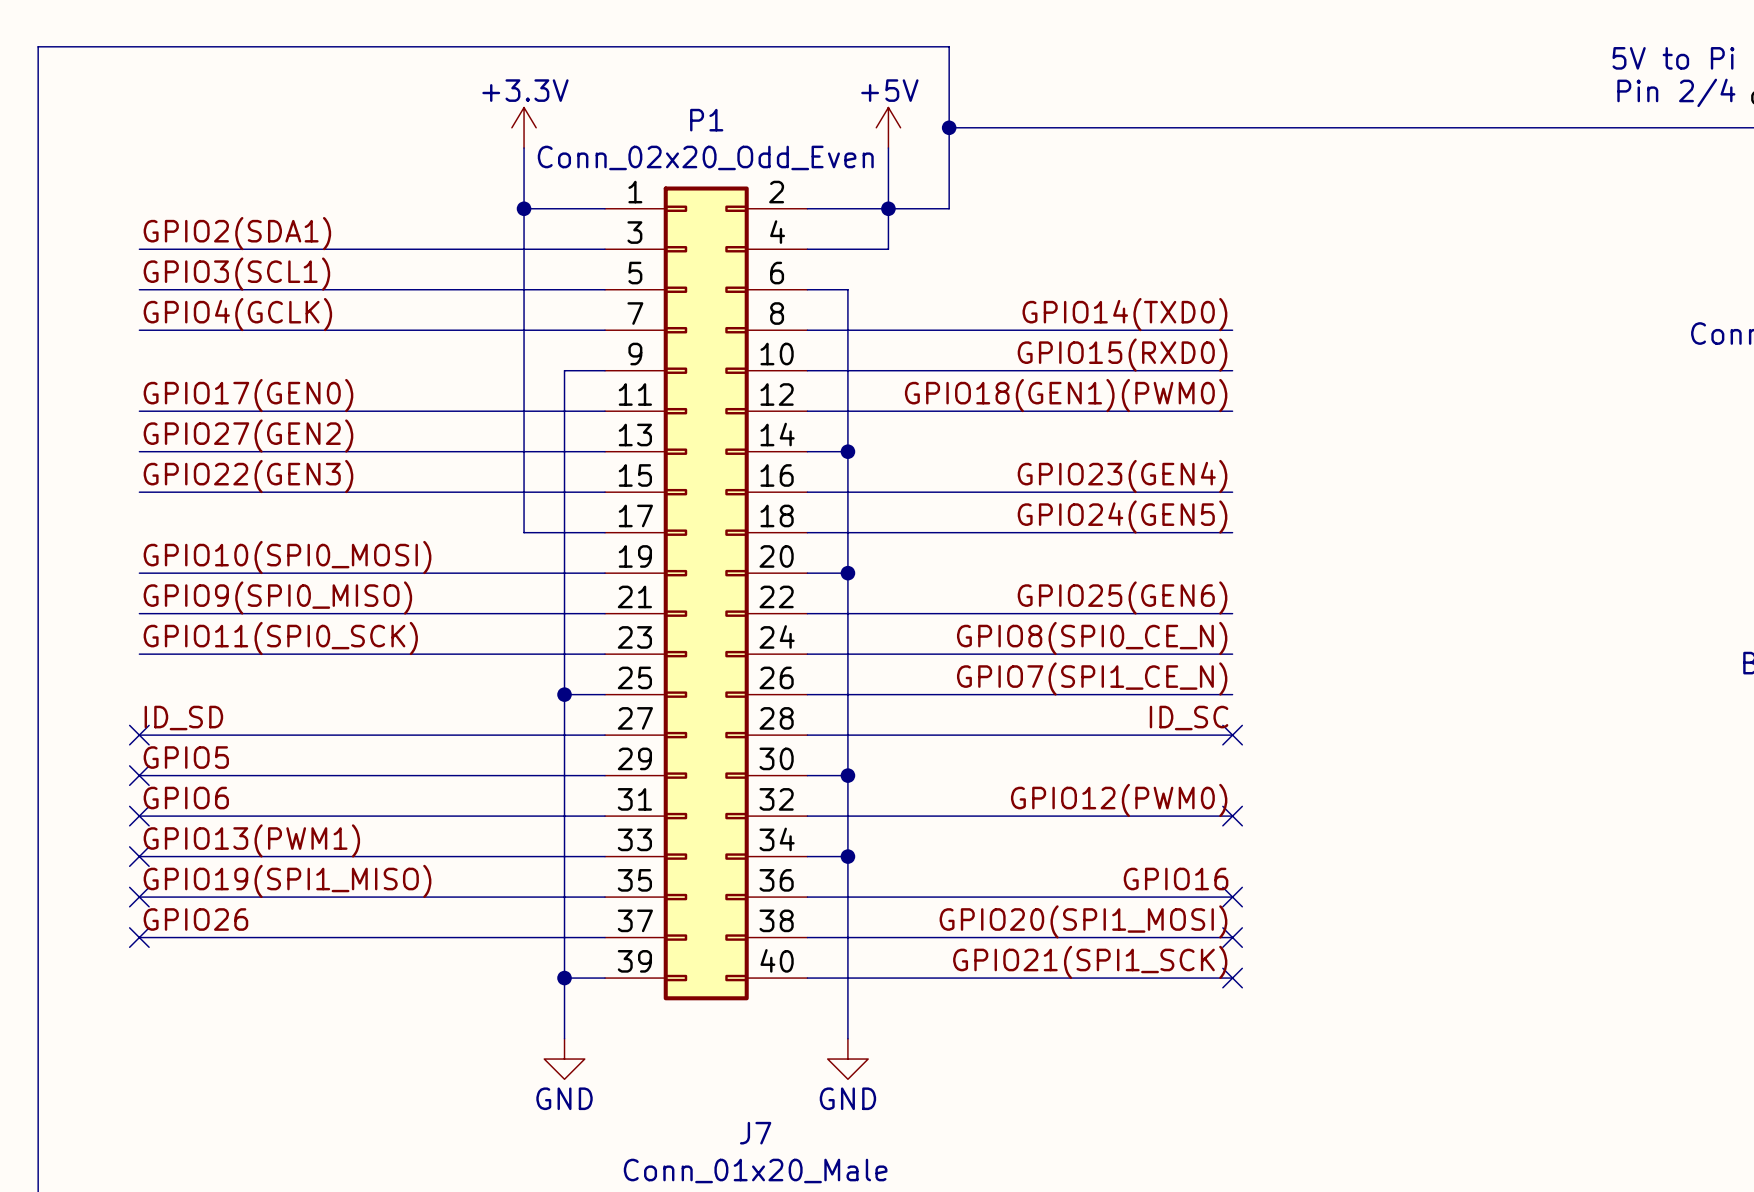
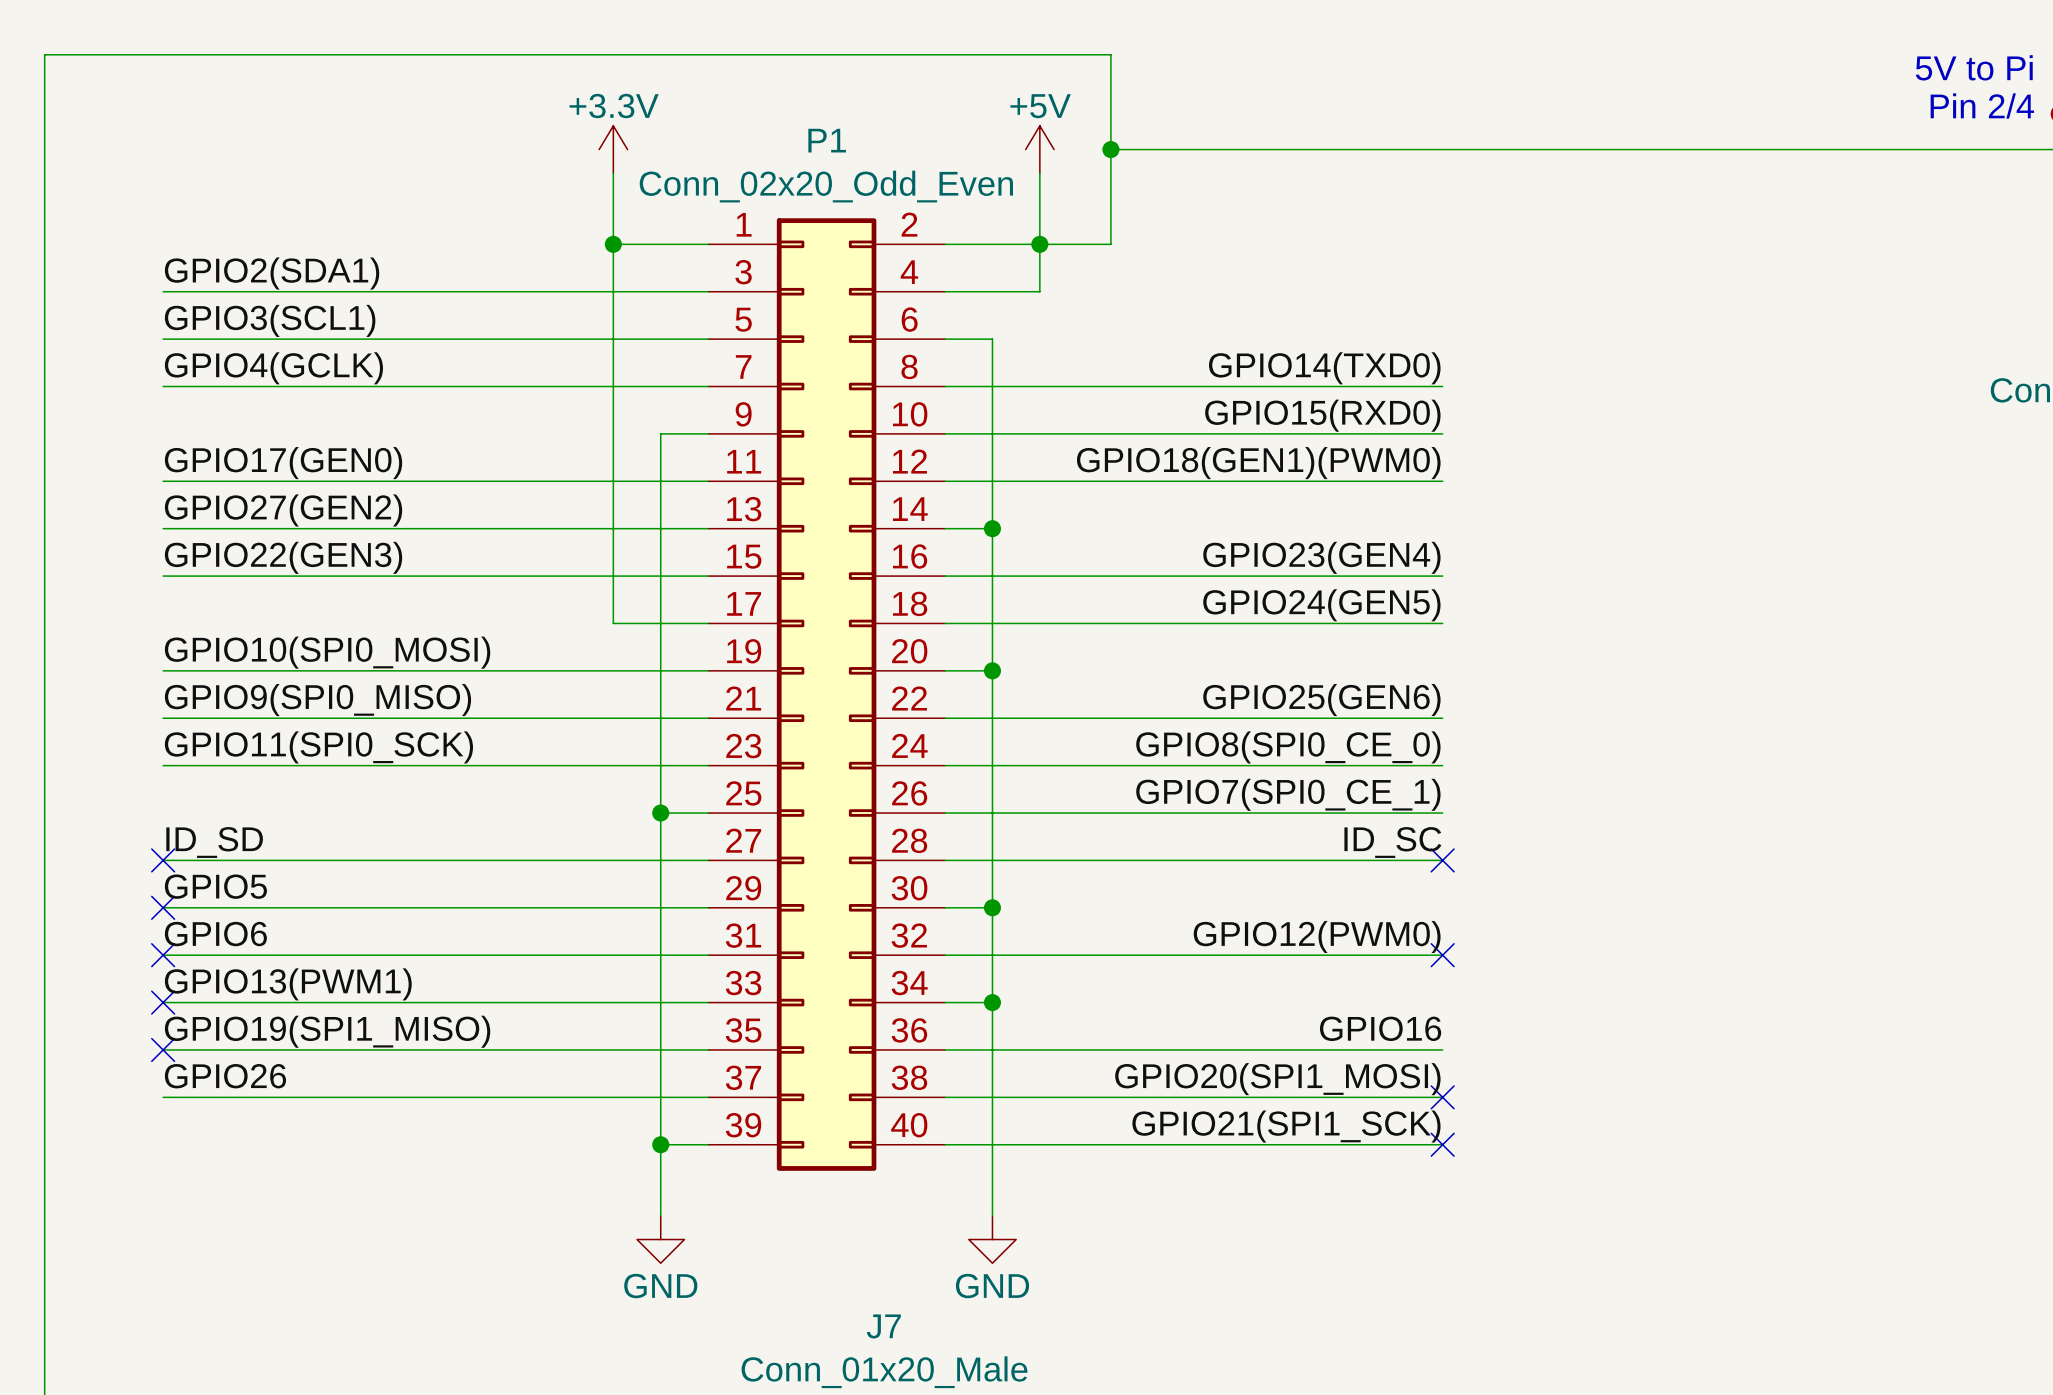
label: GPIO8(SPI0_CE_N) (1092, 638) -> GPIO8(SPI0_CE_0) (1288, 747)
label: GPIO7(SPI1_CE_N) (1092, 678) -> GPIO7(SPI0_CE_1) (1288, 794)
no-connect mark: (1232, 897) -> none
no-connect mark: (139, 937) -> none

